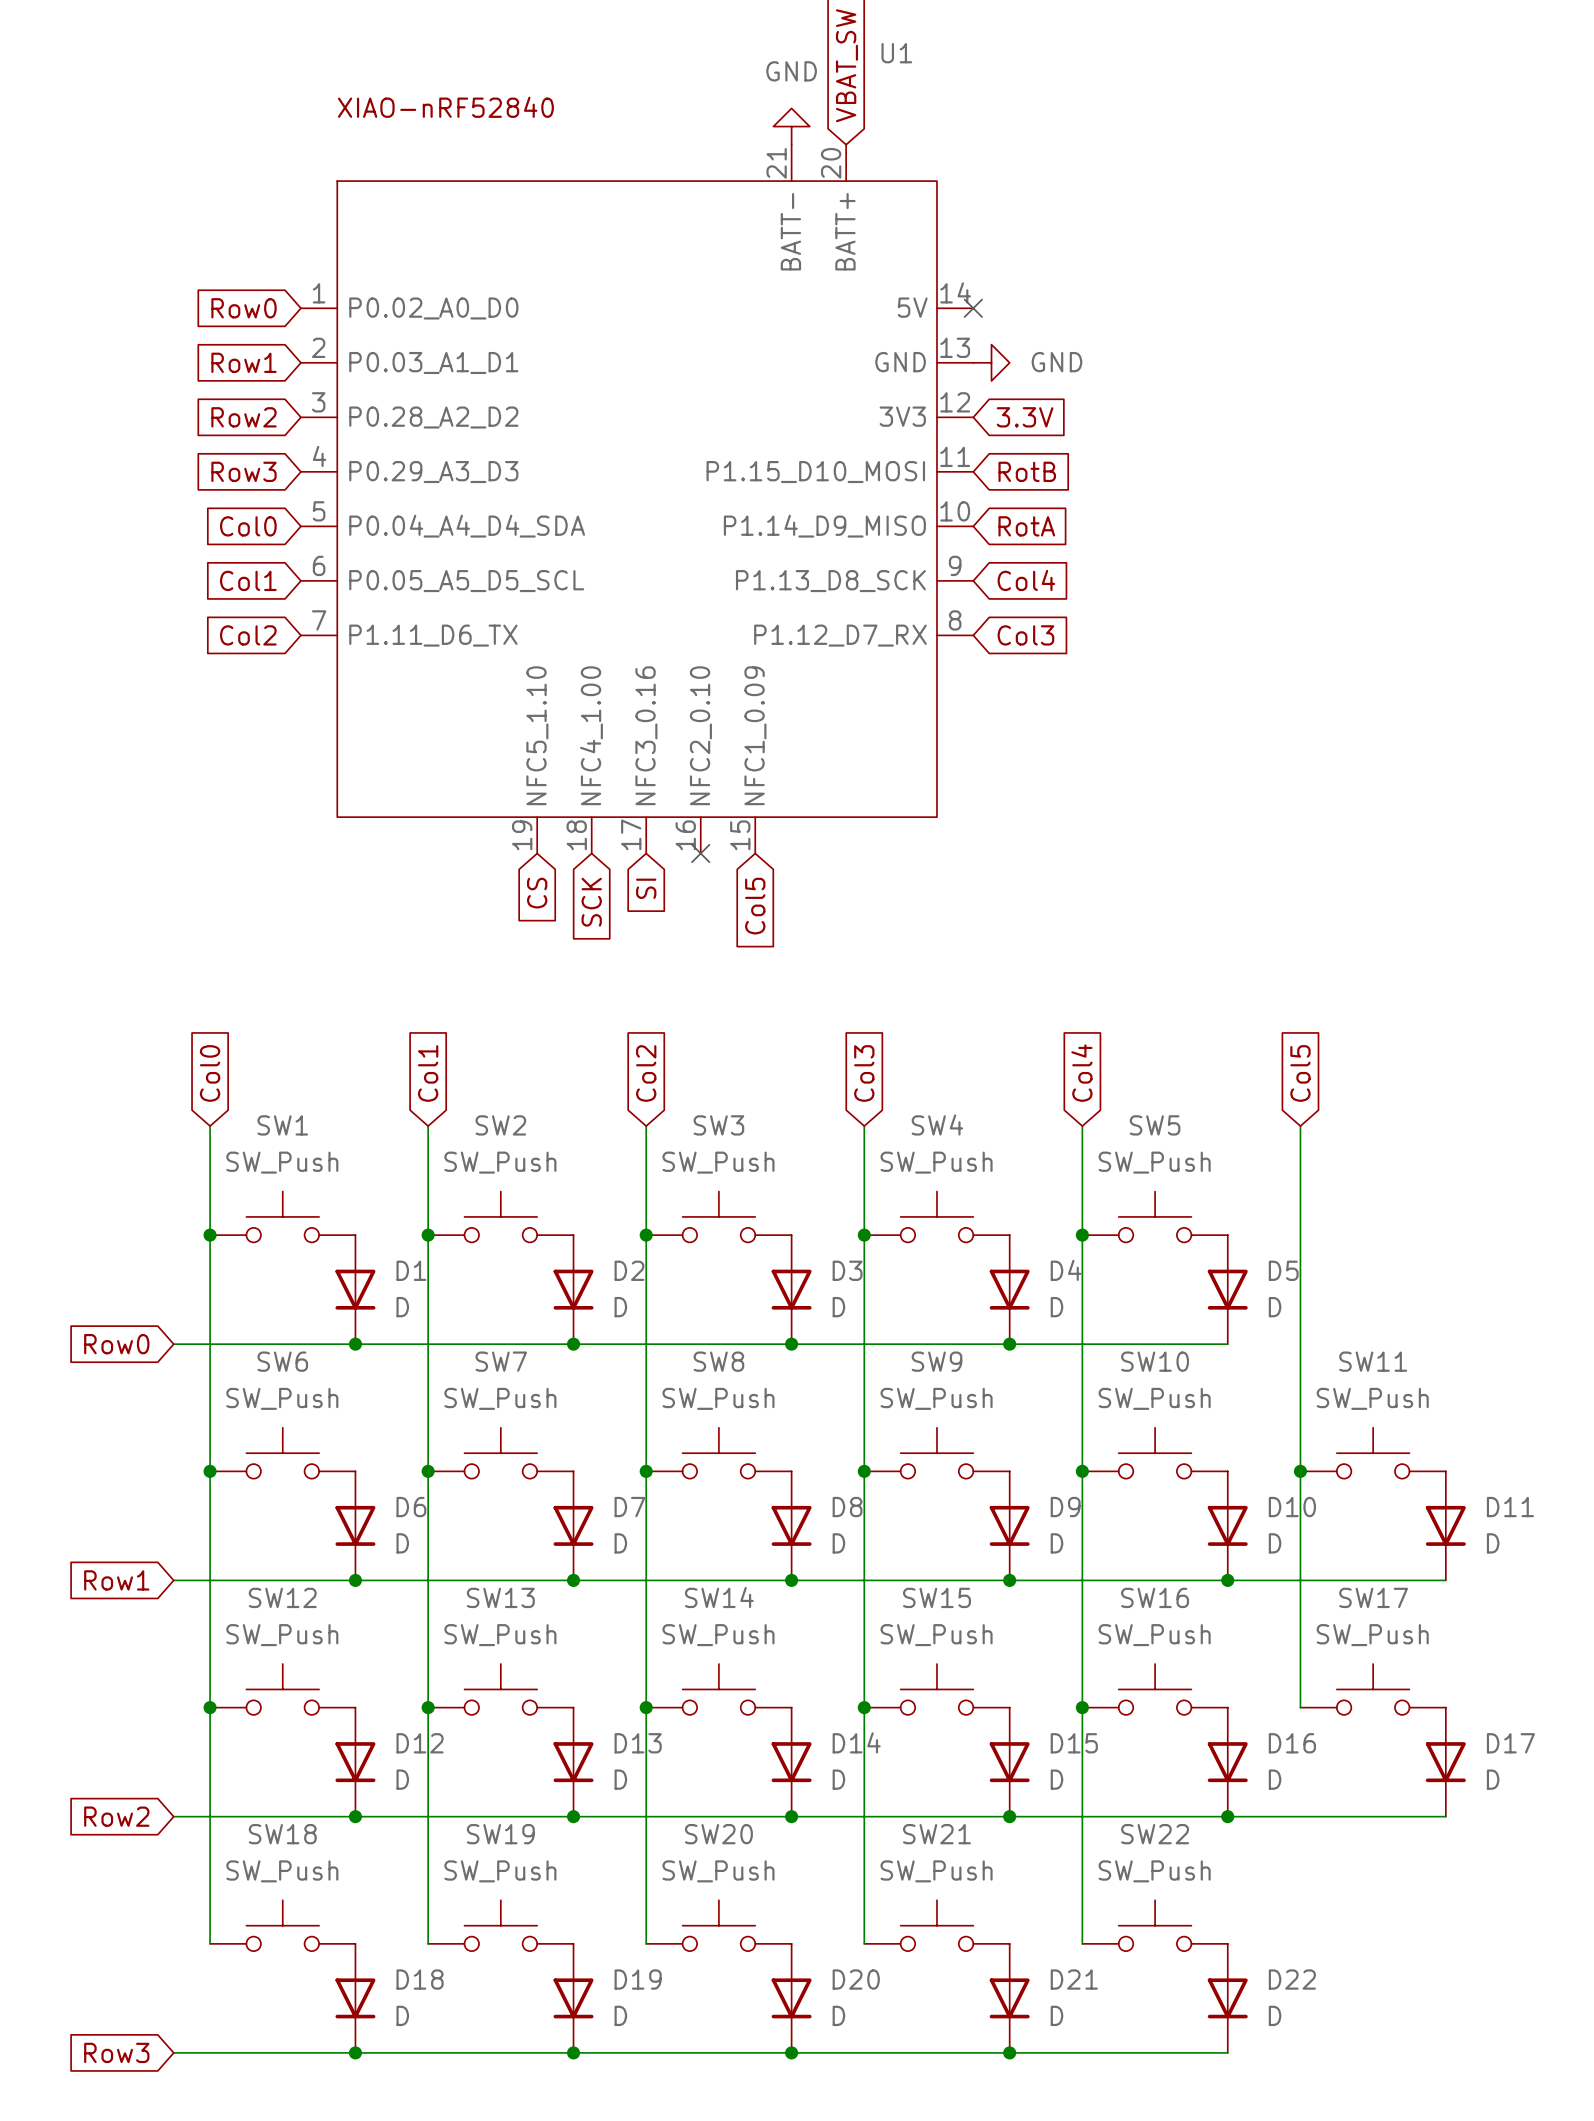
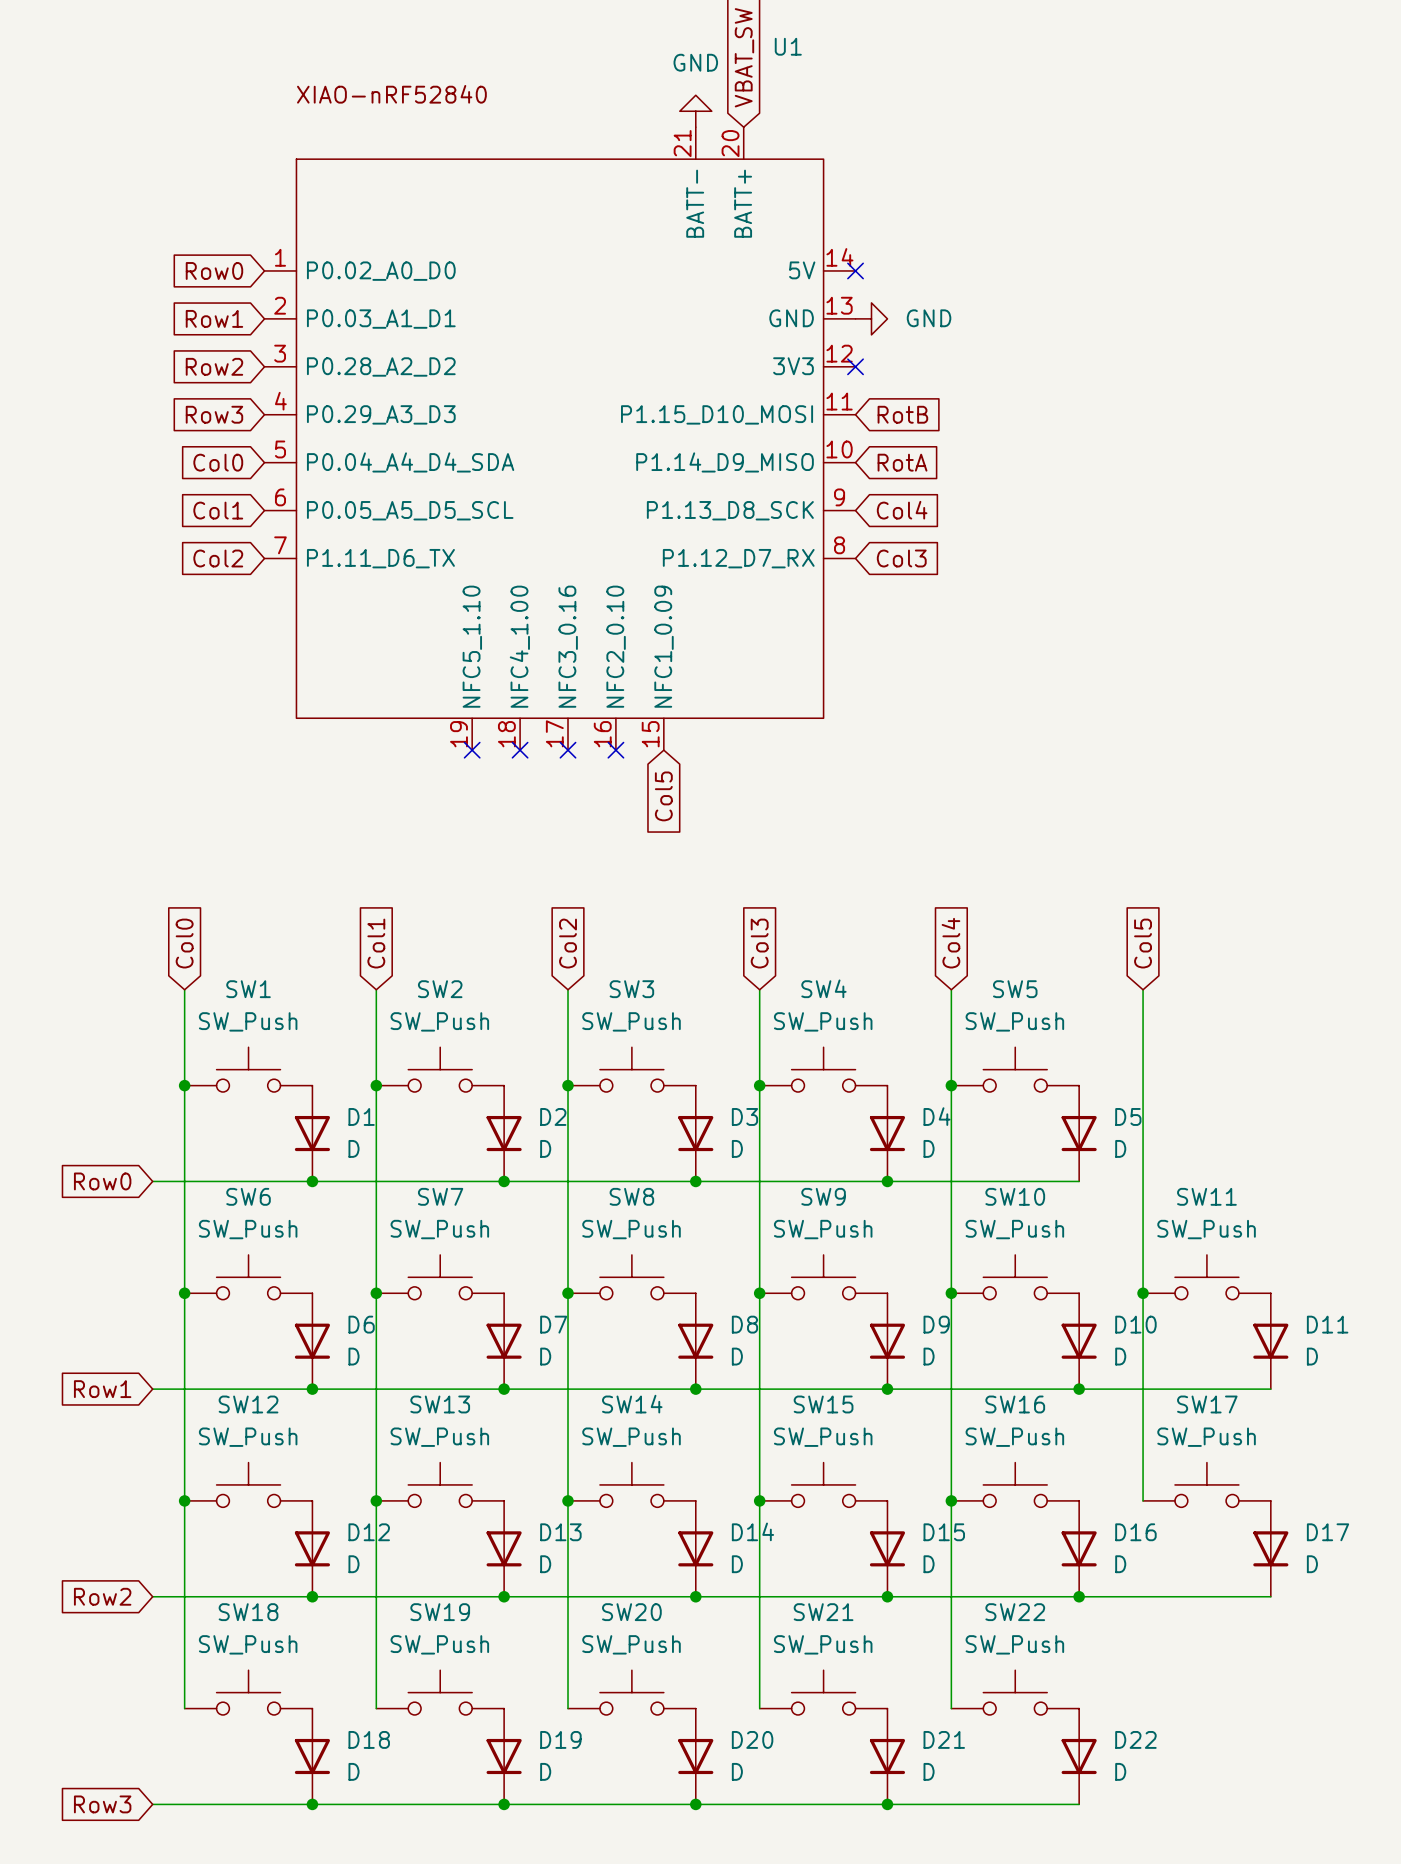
no-connect mark: none -> (855, 366)
global label: 3.3V (1025, 417) -> none
no-connect mark: none -> (472, 750)
no-connect mark: none -> (520, 750)
no-connect mark: none -> (568, 750)
global label: SI (646, 888) -> none
global label: CS (537, 893) -> none
global label: SCK (591, 902) -> none

